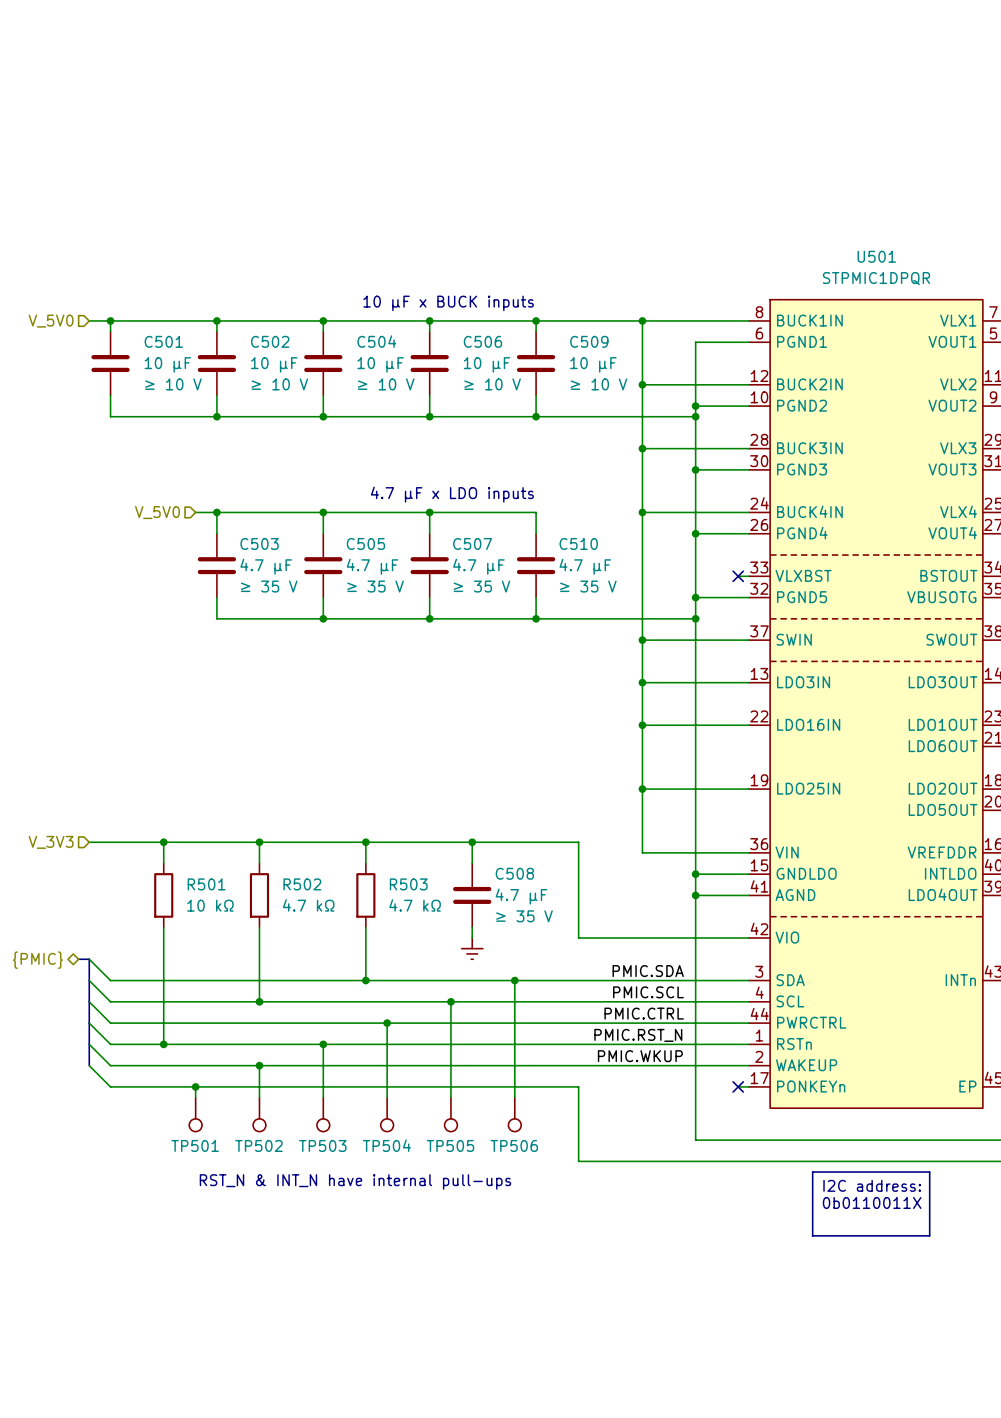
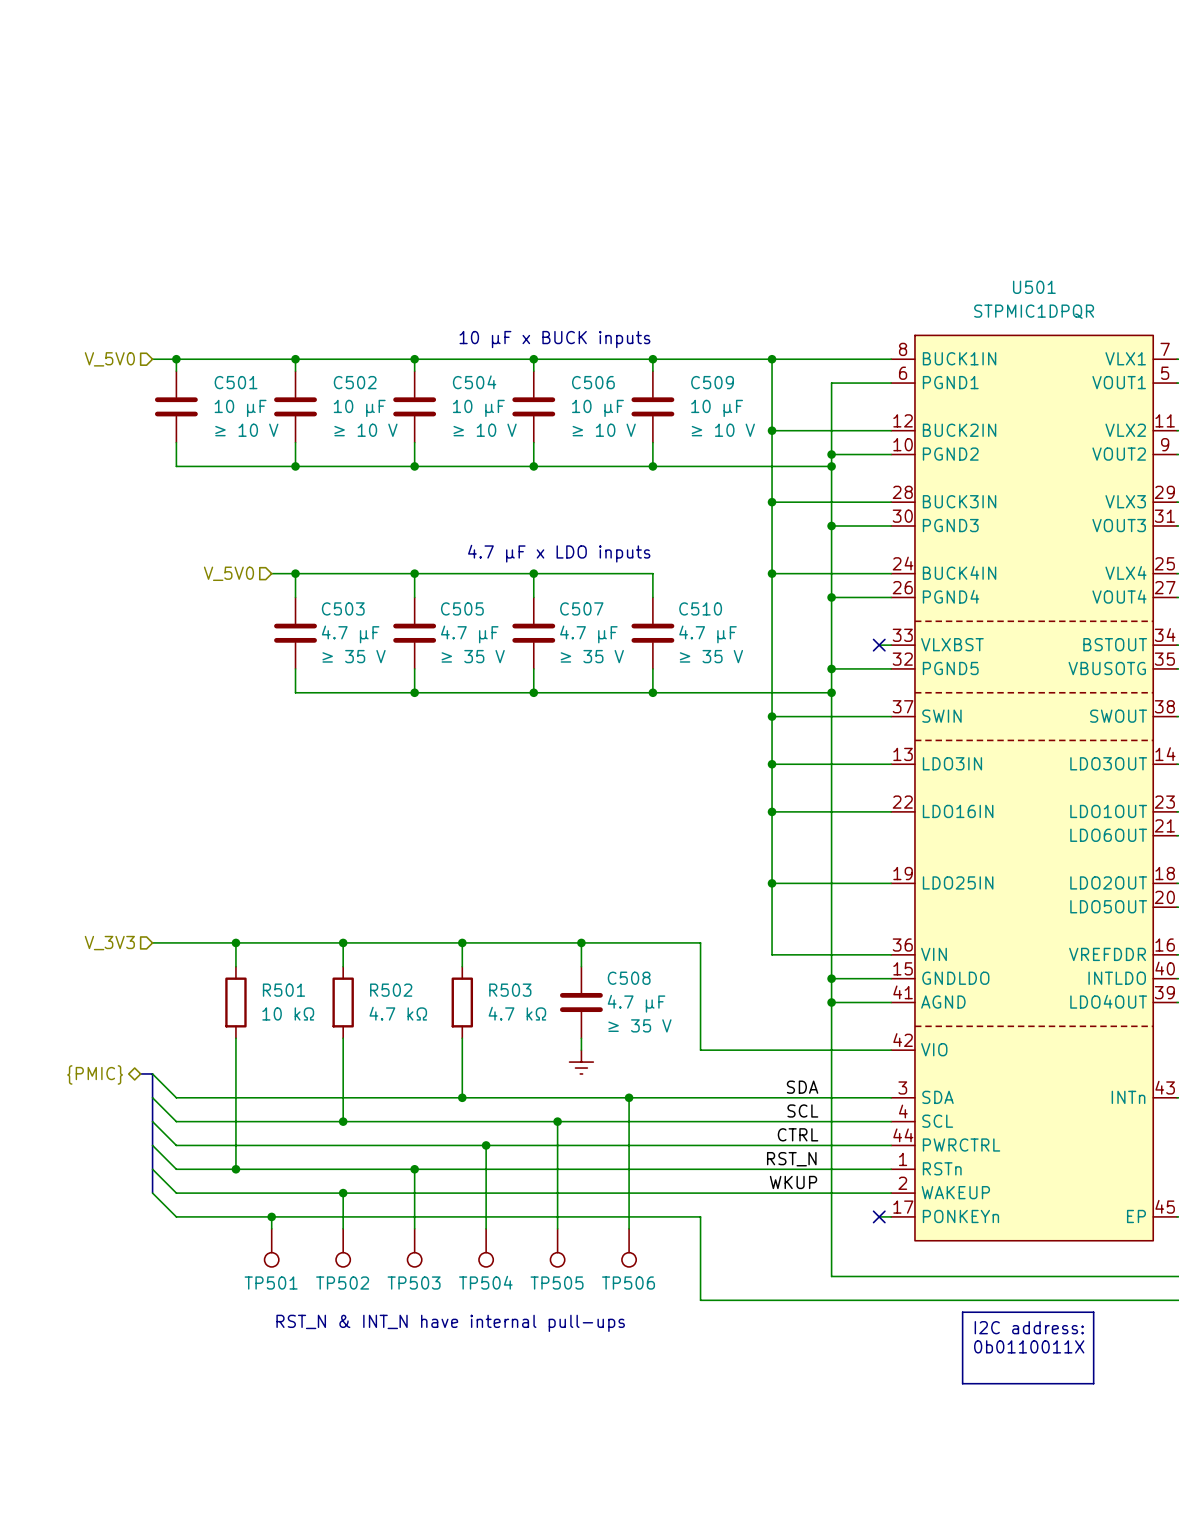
label: PMIC.SDA (648, 971) -> SDA (802, 1087)
label: PMIC.SCL (648, 992) -> SCL (802, 1111)
label: PMIC.CTRL (644, 1013) -> CTRL (798, 1134)
label: PMIC.RST_N (638, 1035) -> RST_N (791, 1159)
label: PMIC.WKUP (640, 1056) -> WKUP (793, 1182)

